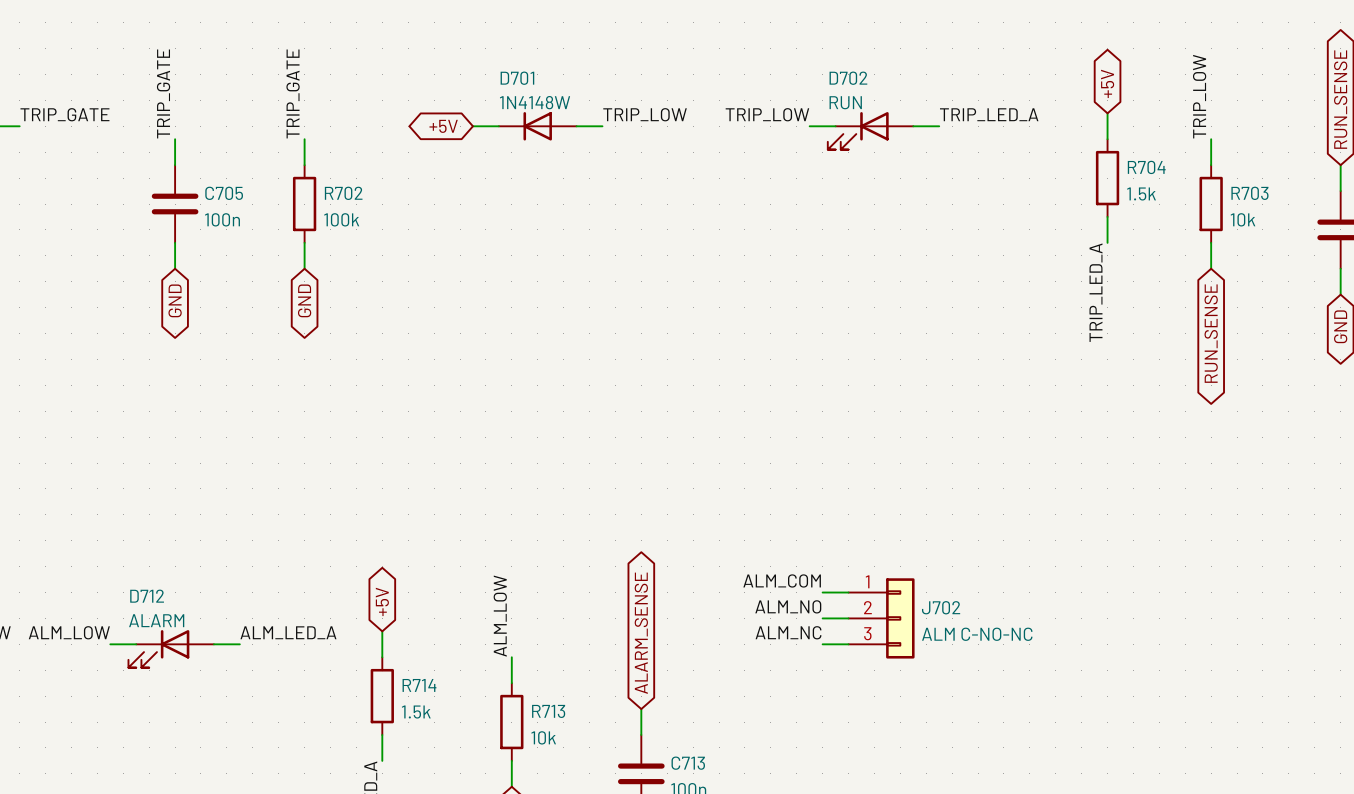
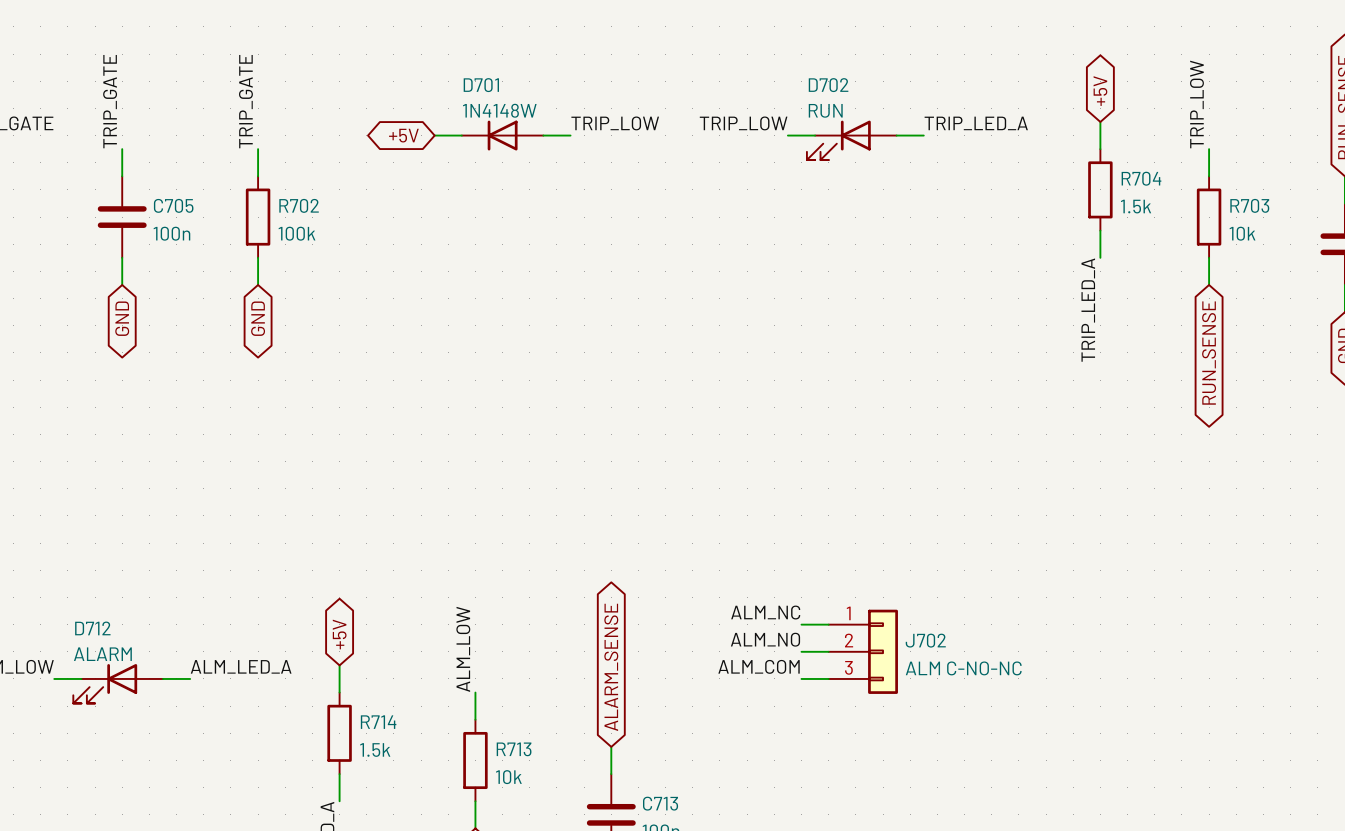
label: ALM_COM (782, 580) -> ALM_NC (765, 612)
label: ALM_NC (788, 632) -> ALM_COM (759, 666)

